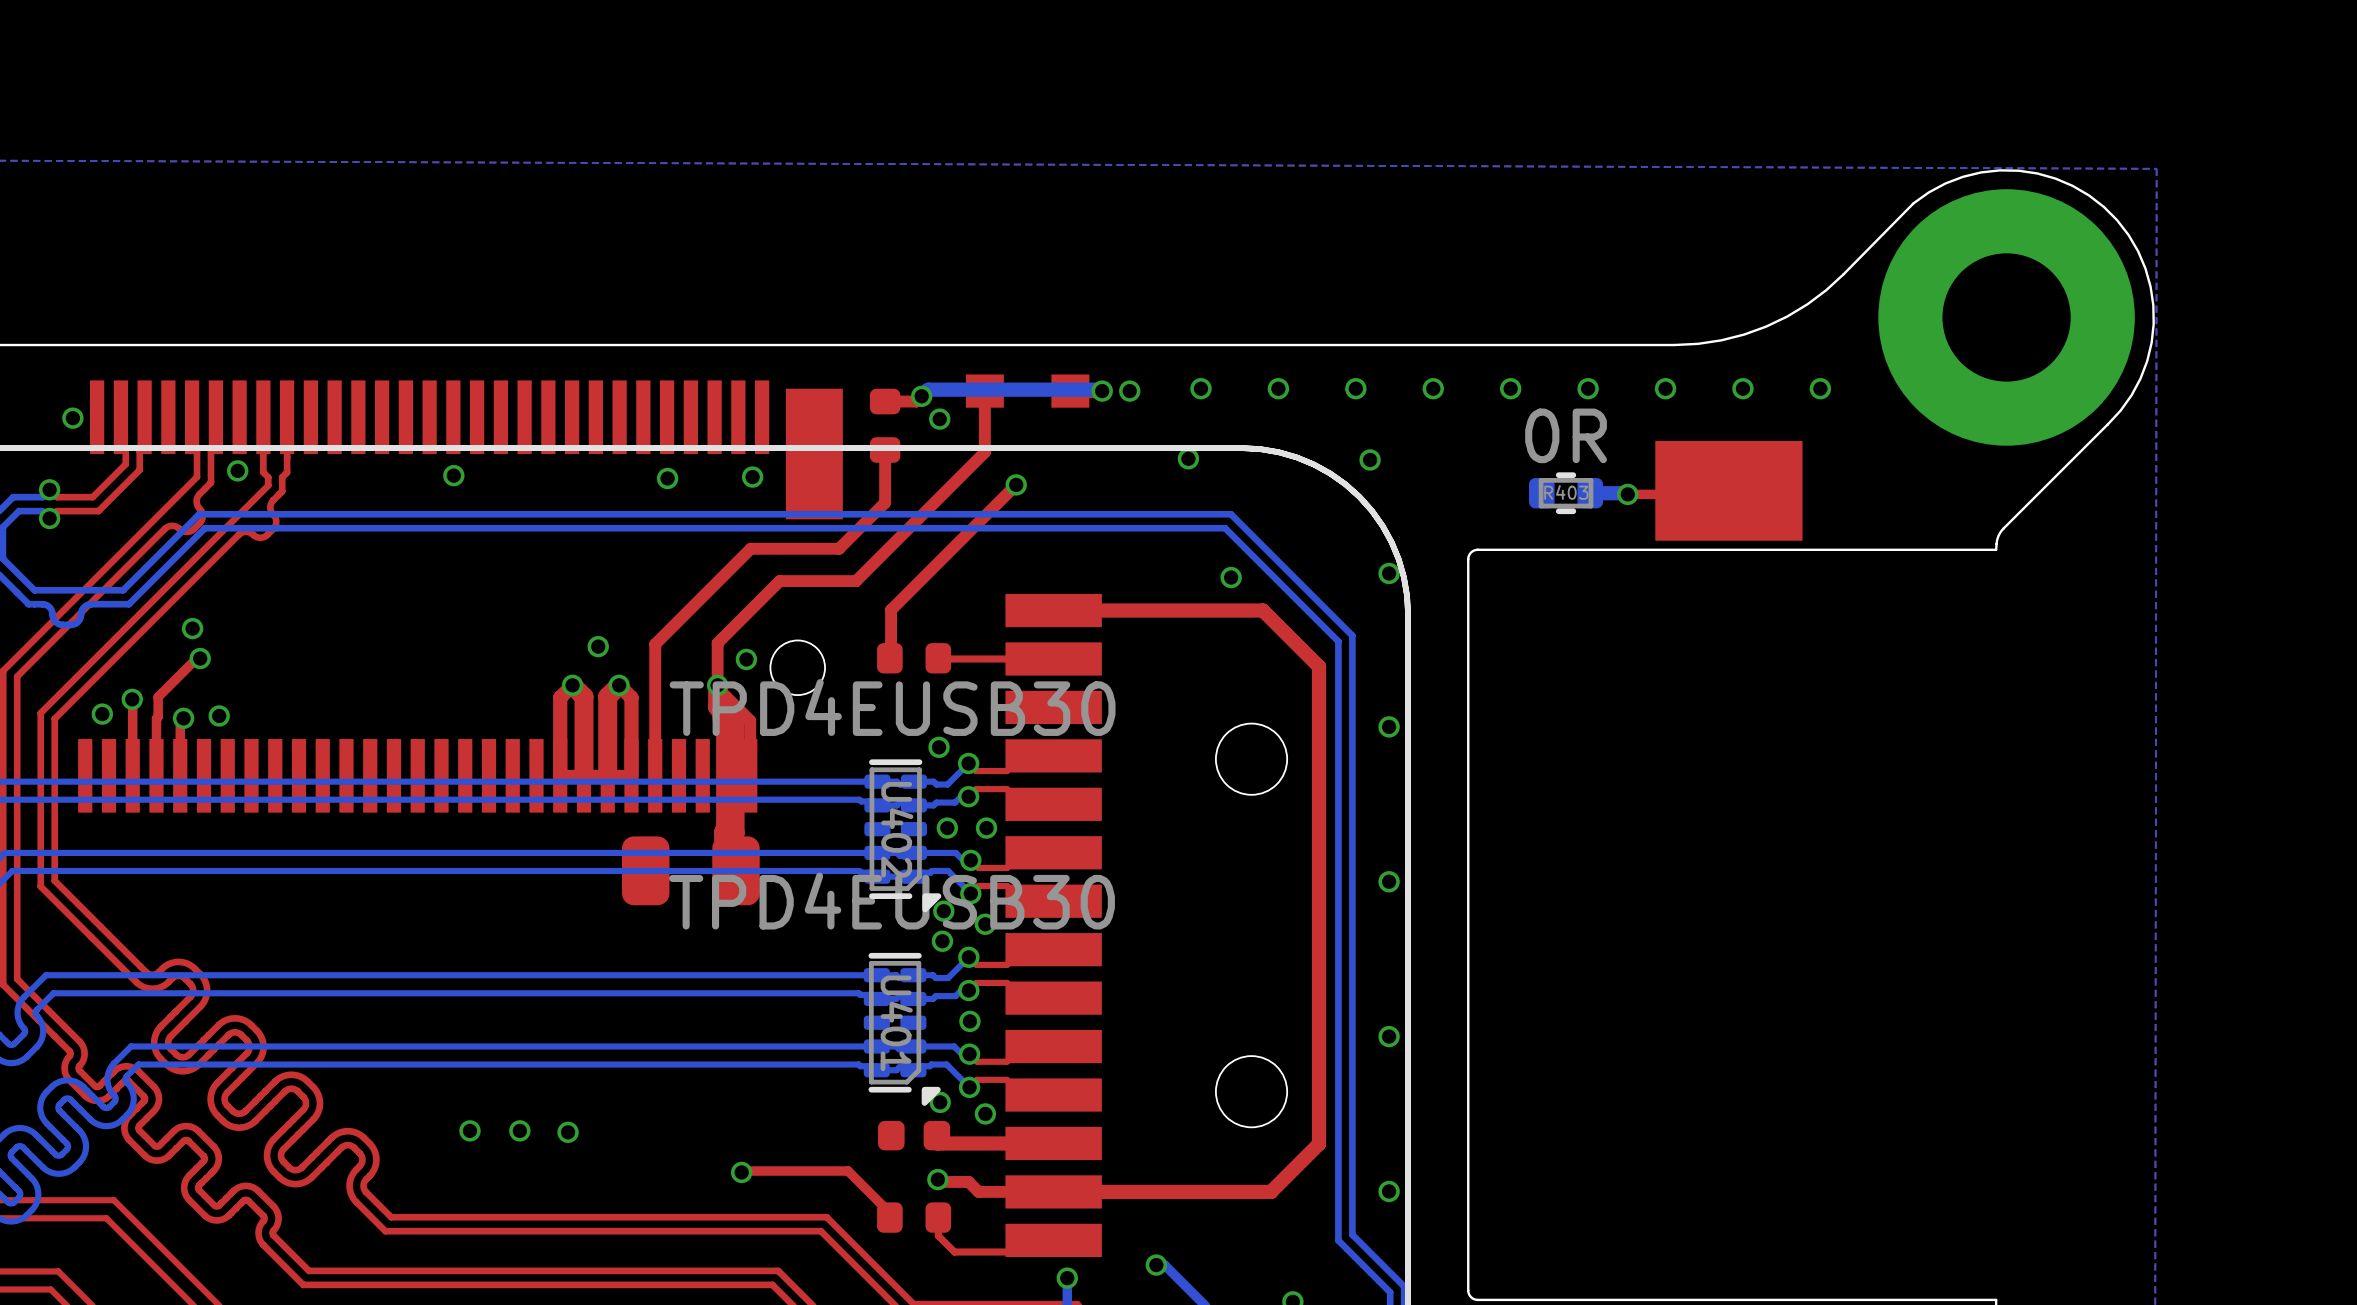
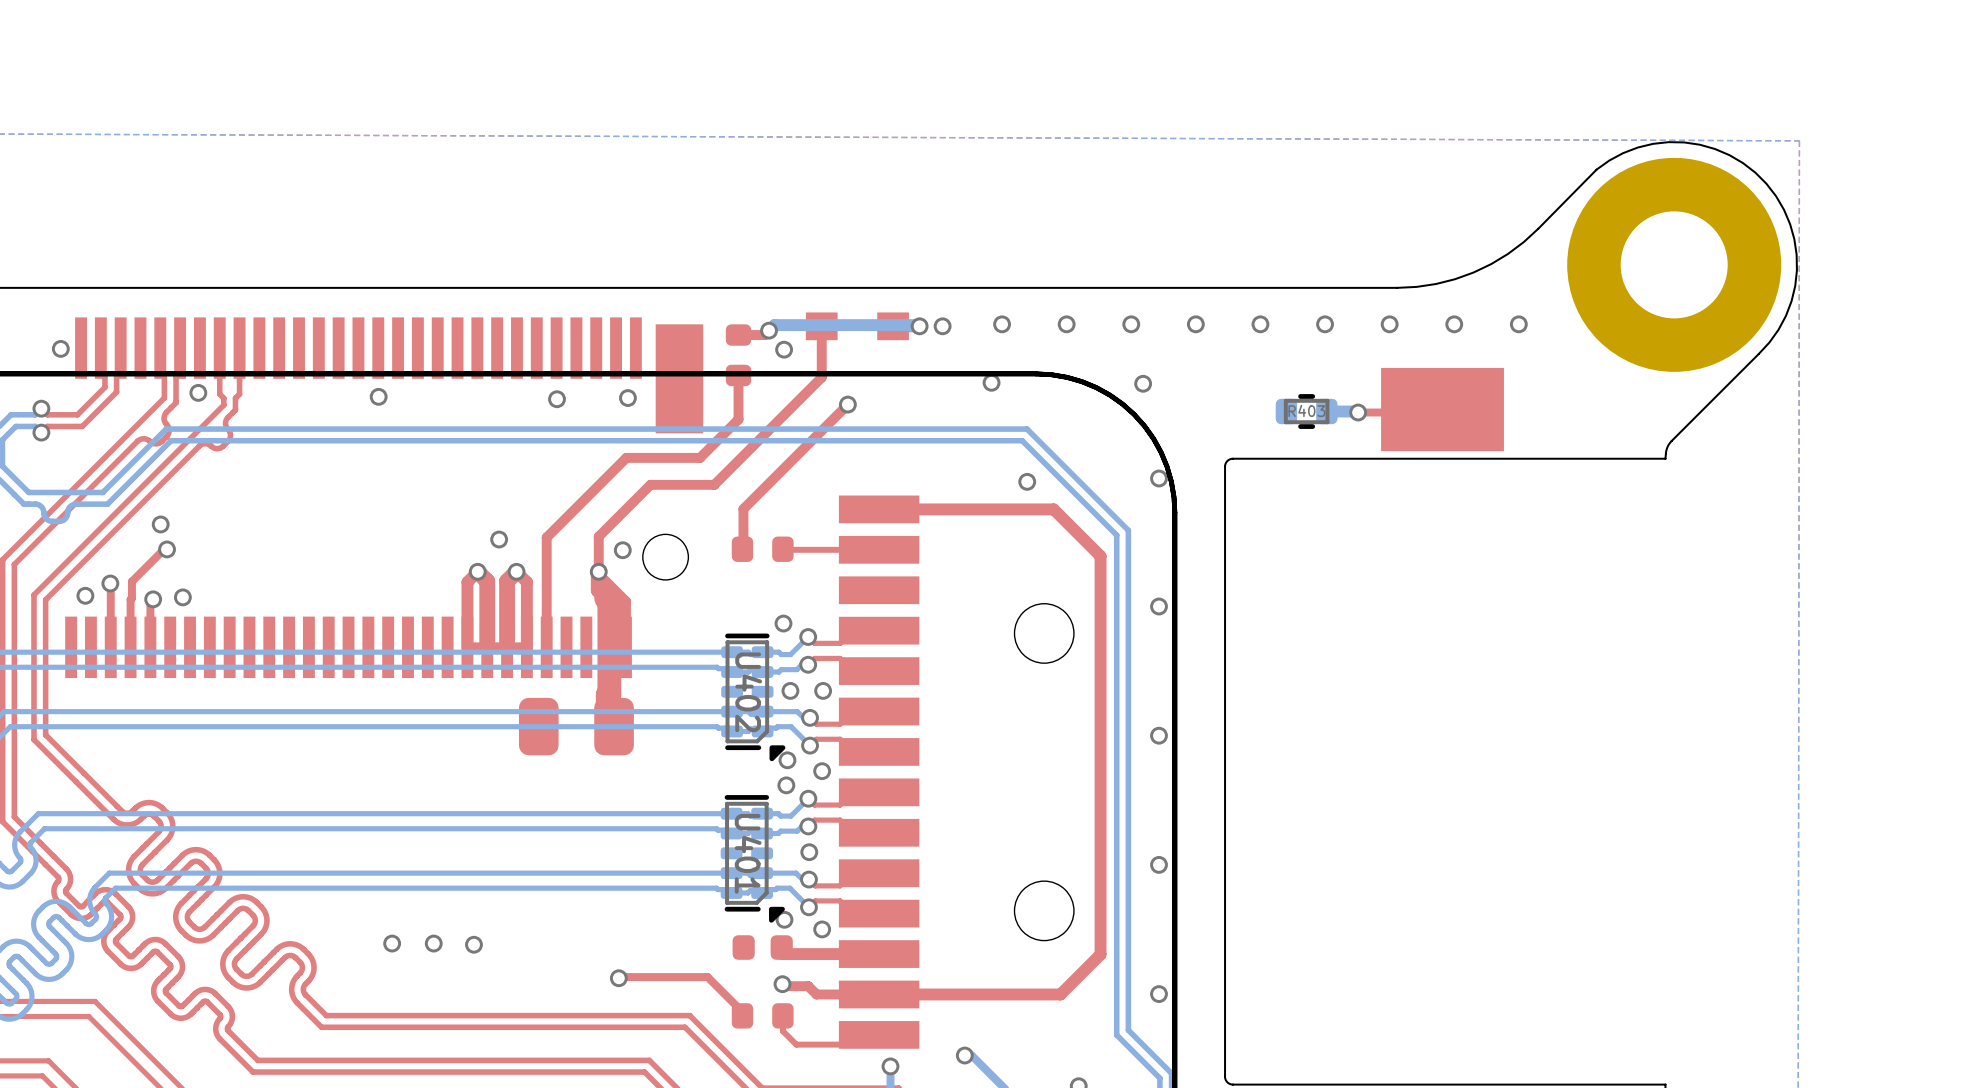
R403 value: 0R (1566, 435) -> none
U402 value: TPD4EUSB30 (892, 707) -> none
U401 value: TPD4EUSB30 (891, 901) -> none

